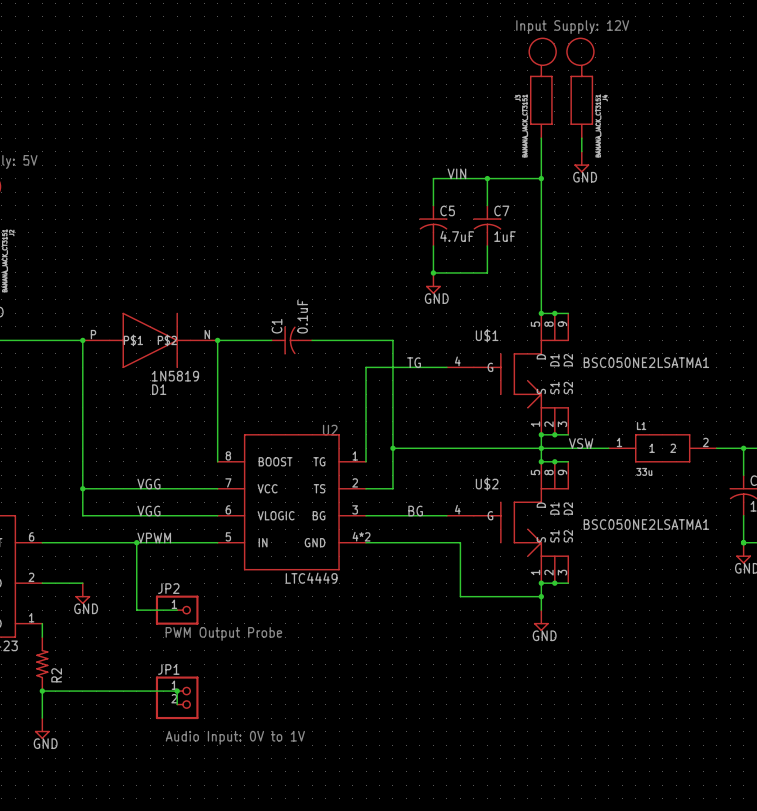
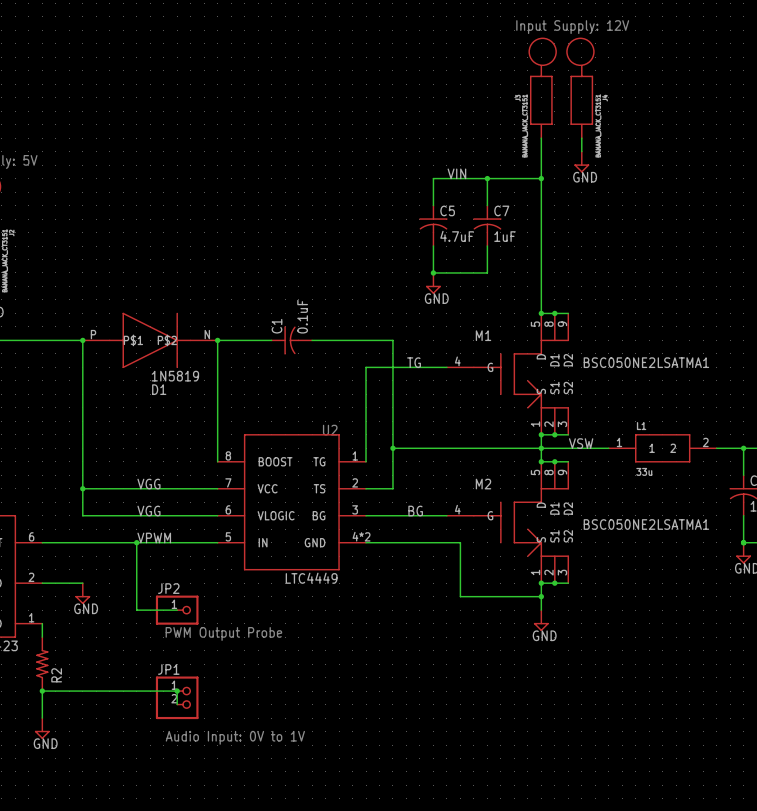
U$1 name: U$1 (487, 335) -> M1 (483, 335)
U$2 name: U$2 (487, 484) -> M2 (483, 484)

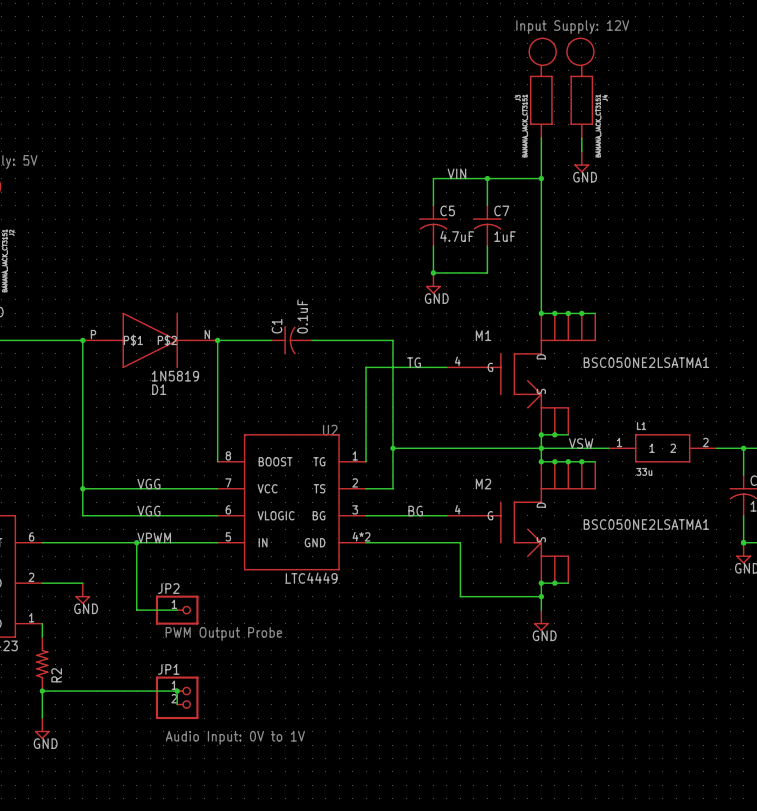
M1 symbol: [446, 313, 569, 435] -> [446, 313, 596, 435]
wire: none -> (568, 313) (595, 313)
junction: none -> (568, 313)
junction: none -> (581, 313)
M2 symbol: [446, 461, 569, 584] -> [446, 461, 596, 584]
wire: none -> (568, 461) (595, 461)
junction: none -> (568, 461)
junction: none -> (581, 461)

